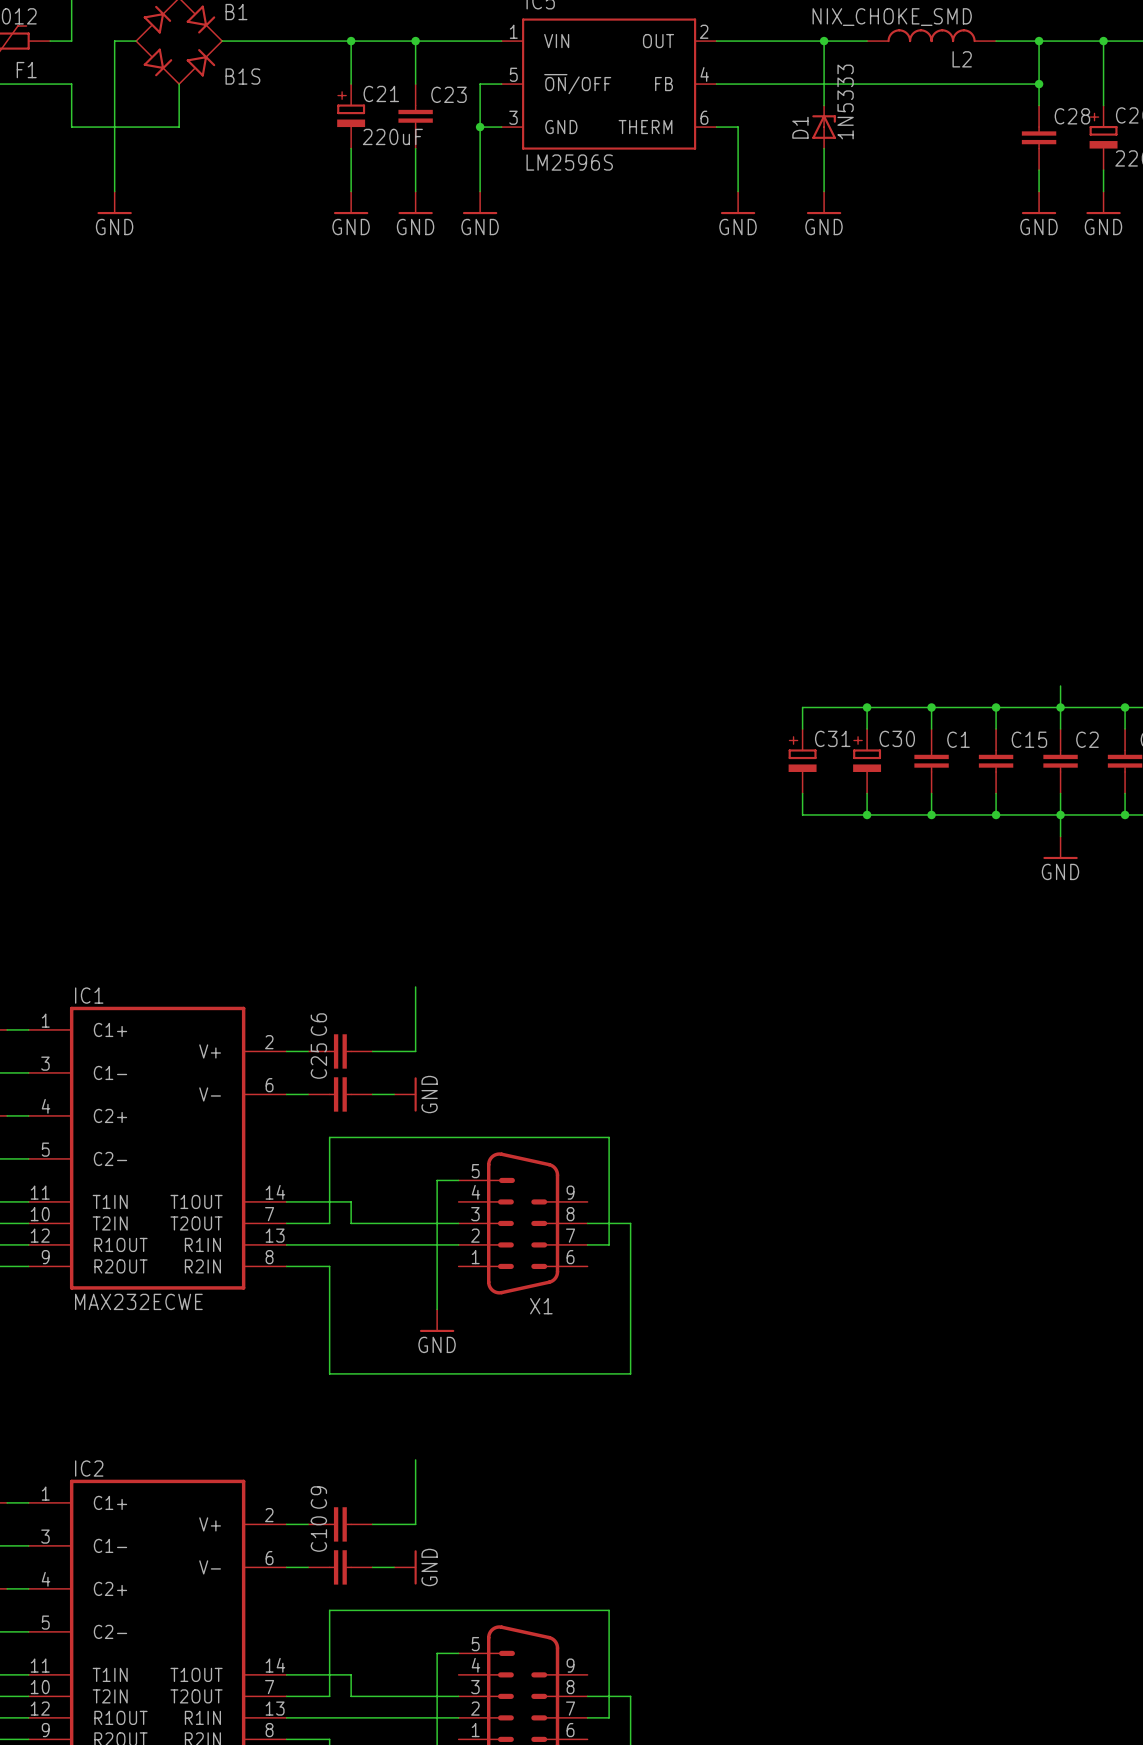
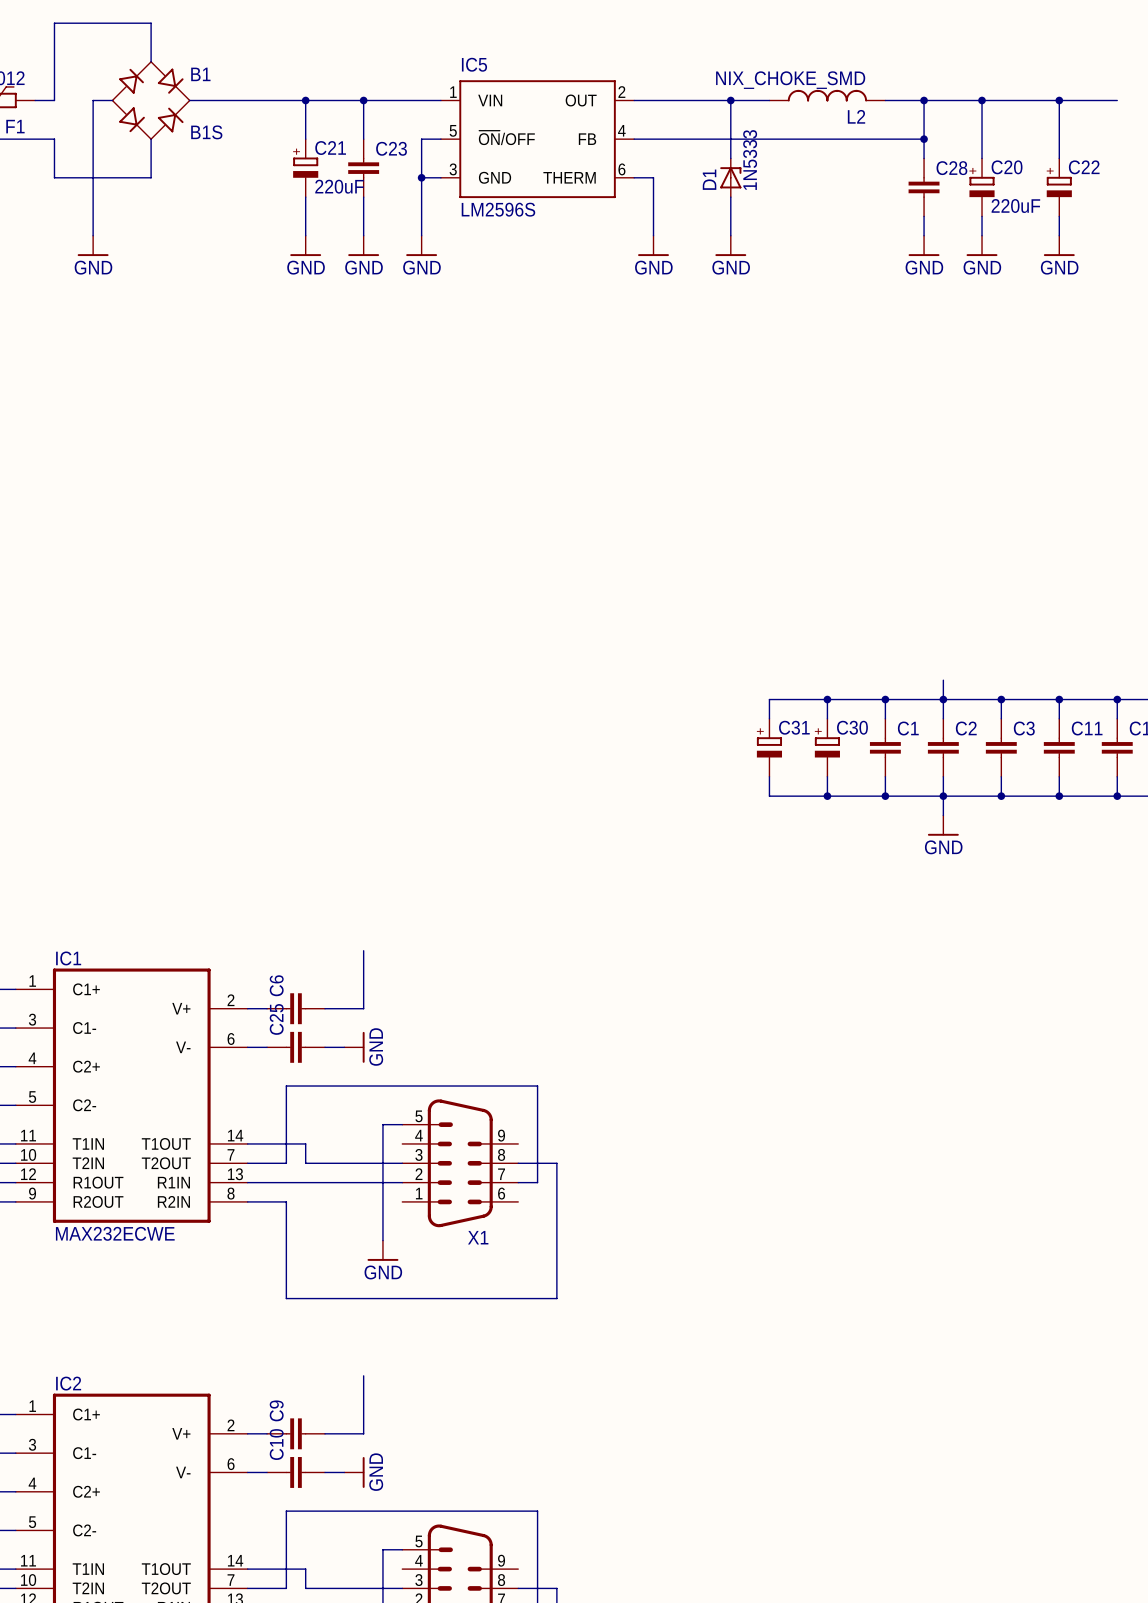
wire: (867, 707) (802, 707) (802, 728) -> none
junction: (867, 707) -> none
C30 name: C30 (897, 738) -> C31 (794, 727)
C15 name: C15 (1029, 739) -> C1 (908, 728)
C31: (802, 761) -> none
C1: (931, 761) -> none
C30: none -> (827, 747)
wire: (802, 793) (802, 814) (867, 814) -> none
junction: (867, 814) -> none

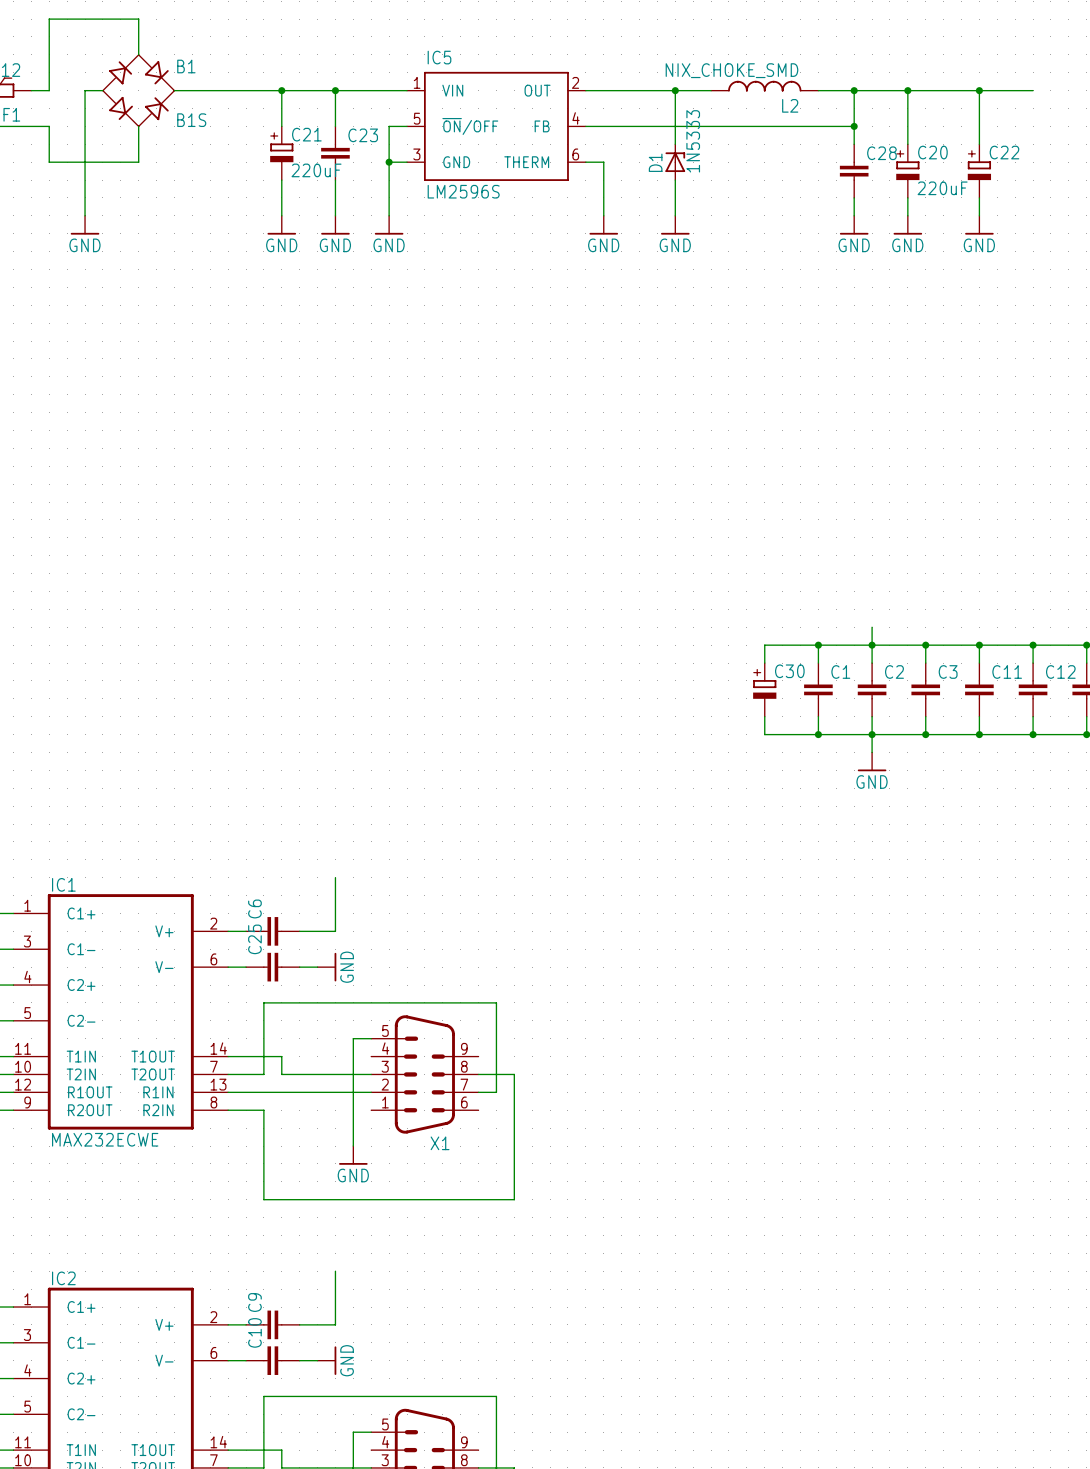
wire: (827, 699) (769, 699) (769, 718) -> none
junction: (827, 699) -> none
C31: (769, 747) -> none
wire: (769, 776) (769, 796) (827, 796) -> none
junction: (827, 796) -> none

